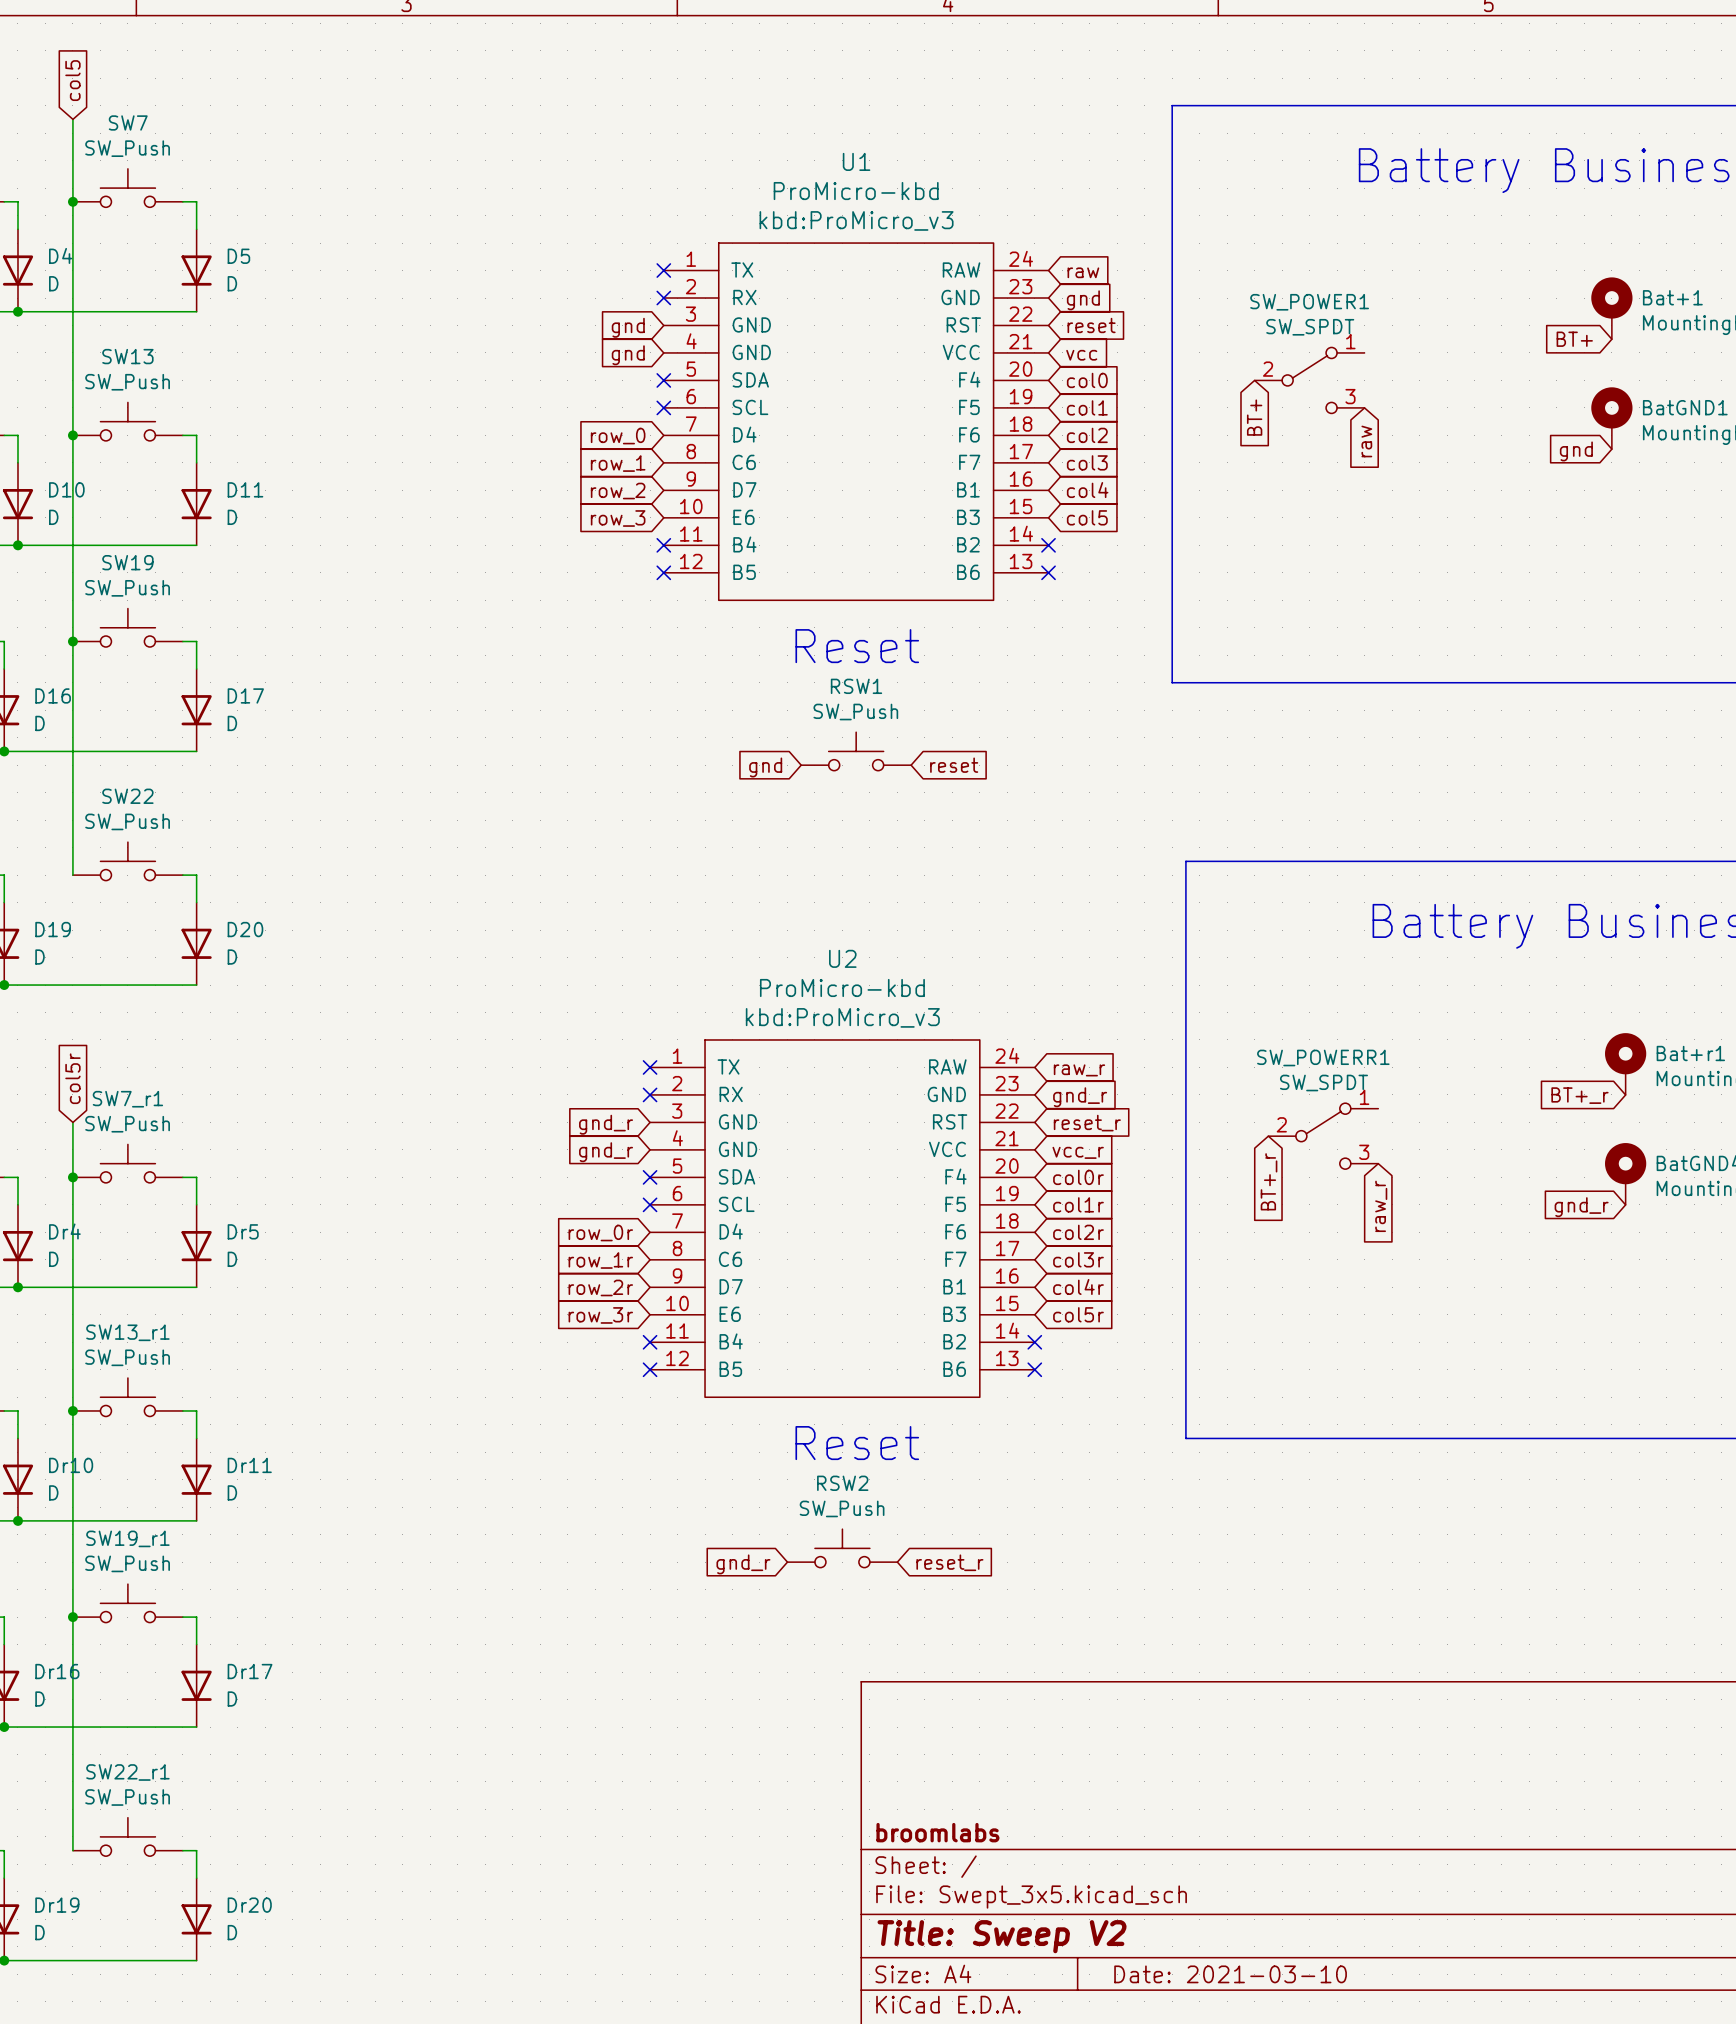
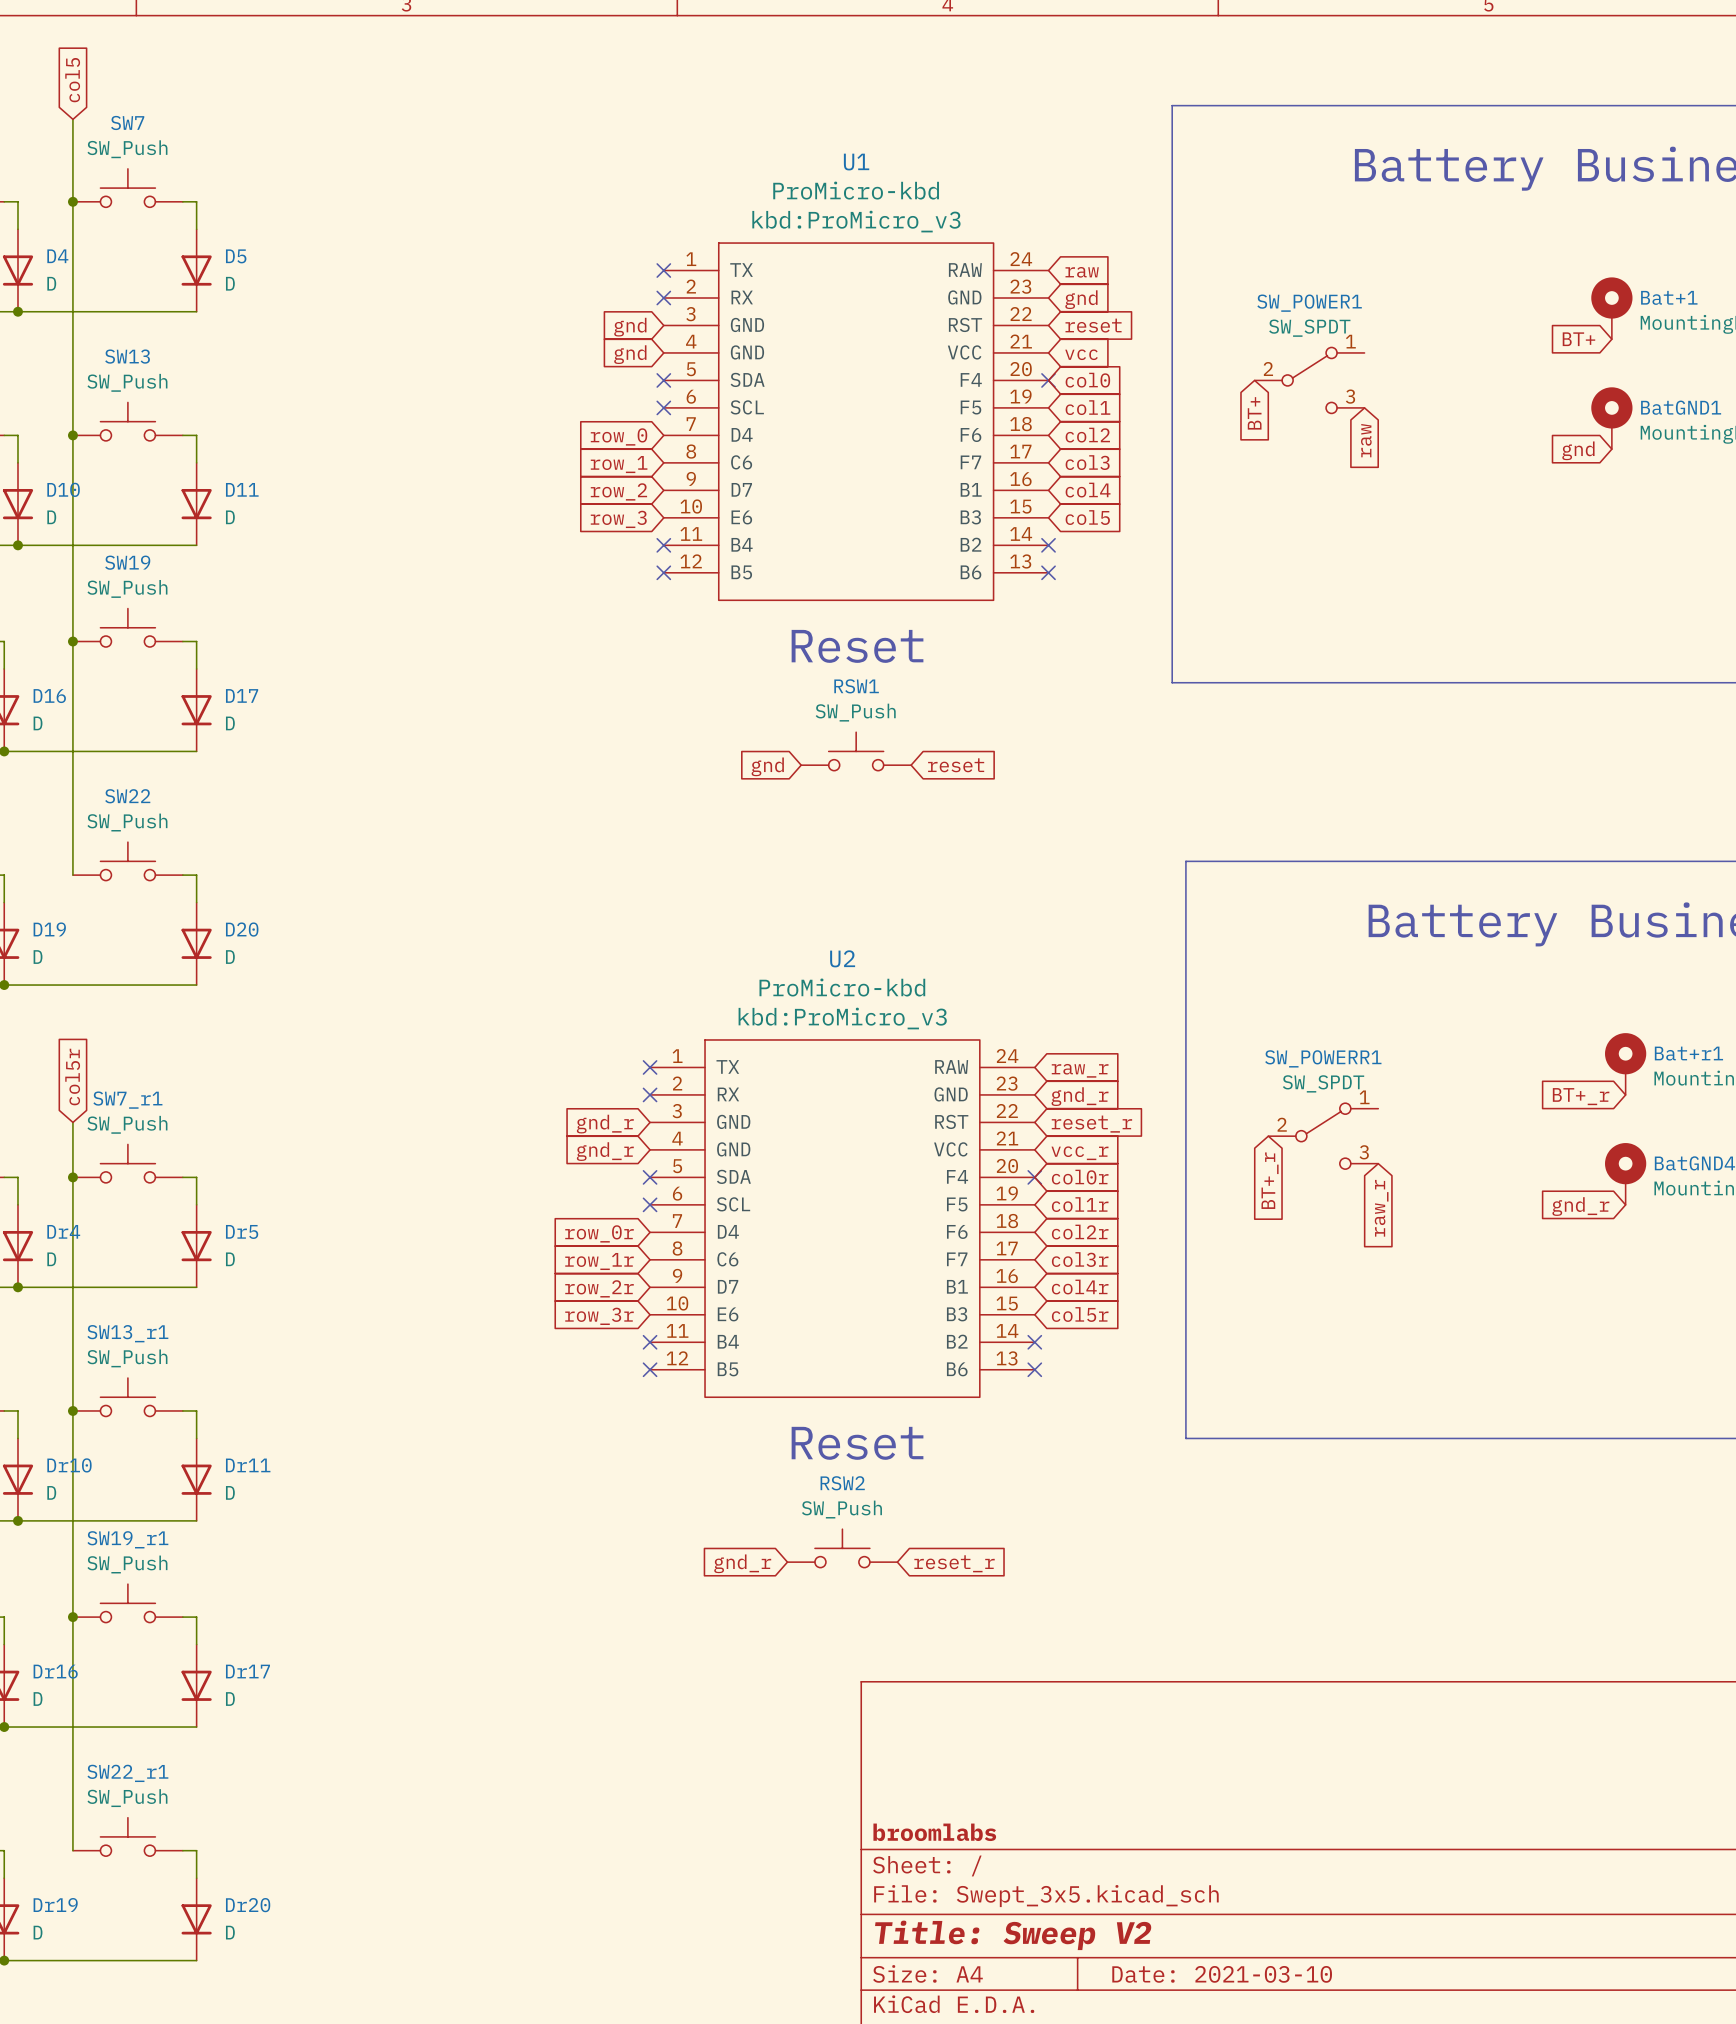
no-connect mark: none -> (1048, 380)
no-connect mark: none -> (1034, 1177)

